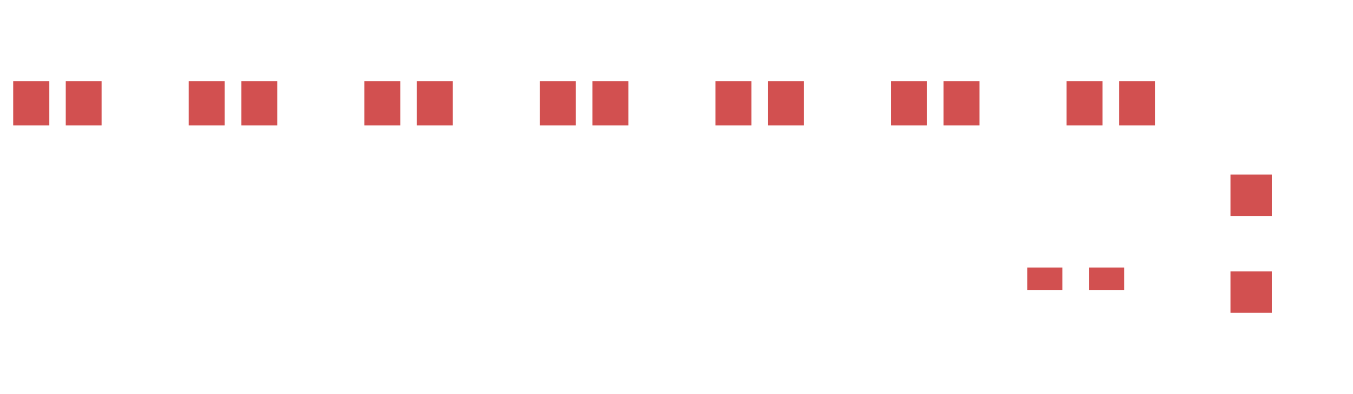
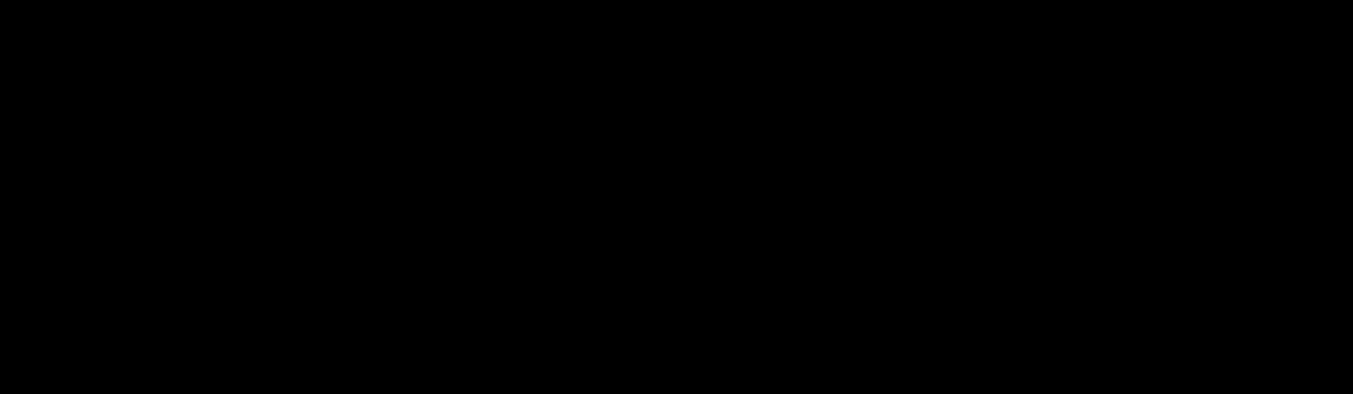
part: (57, 103) -> none
part: (233, 103) -> none
part: (408, 103) -> none
part: (584, 103) -> none
part: (759, 103) -> none
part: (935, 103) -> none
part: (1110, 103) -> none
part: (1251, 243) -> none
part: (1075, 278) -> none

